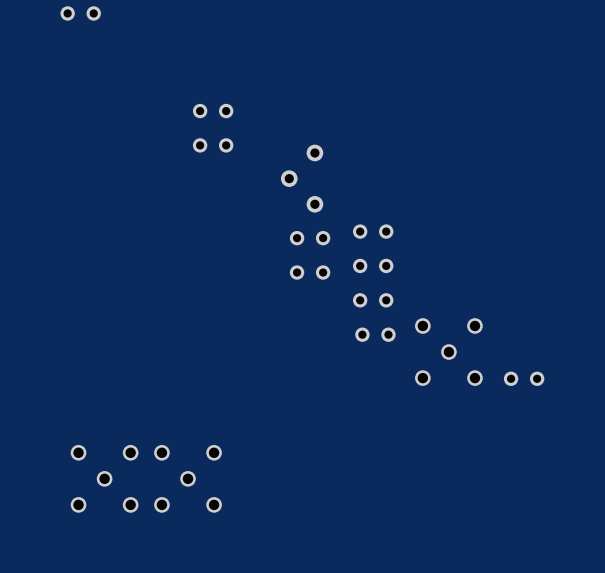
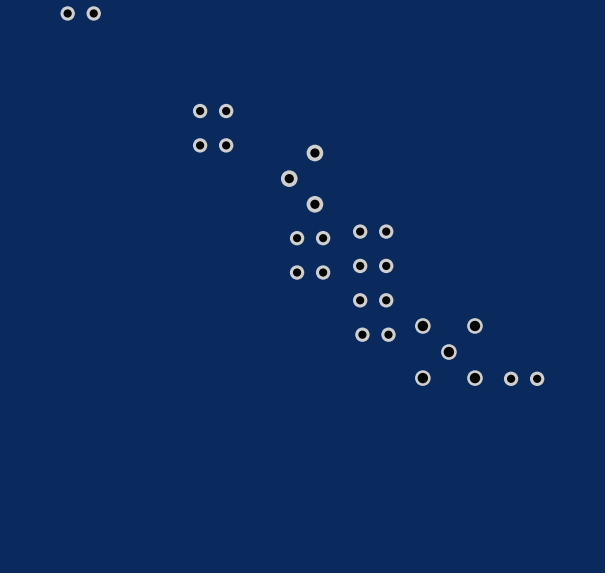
part: (104, 478) -> none
part: (188, 478) -> none

